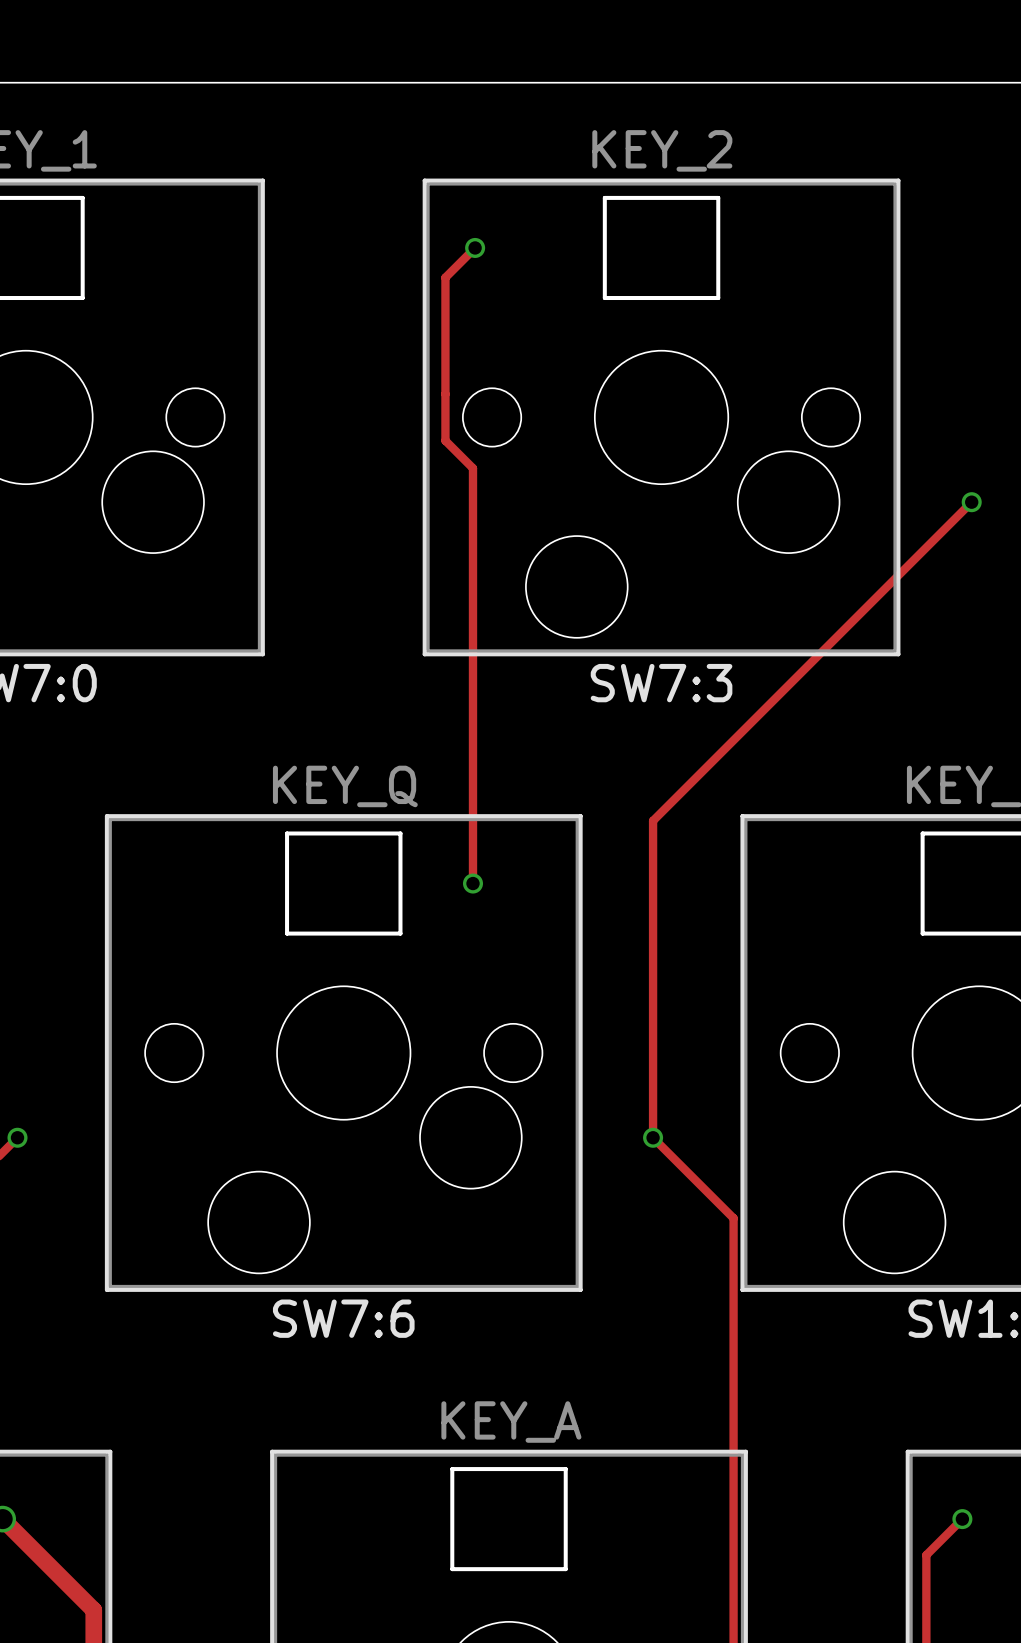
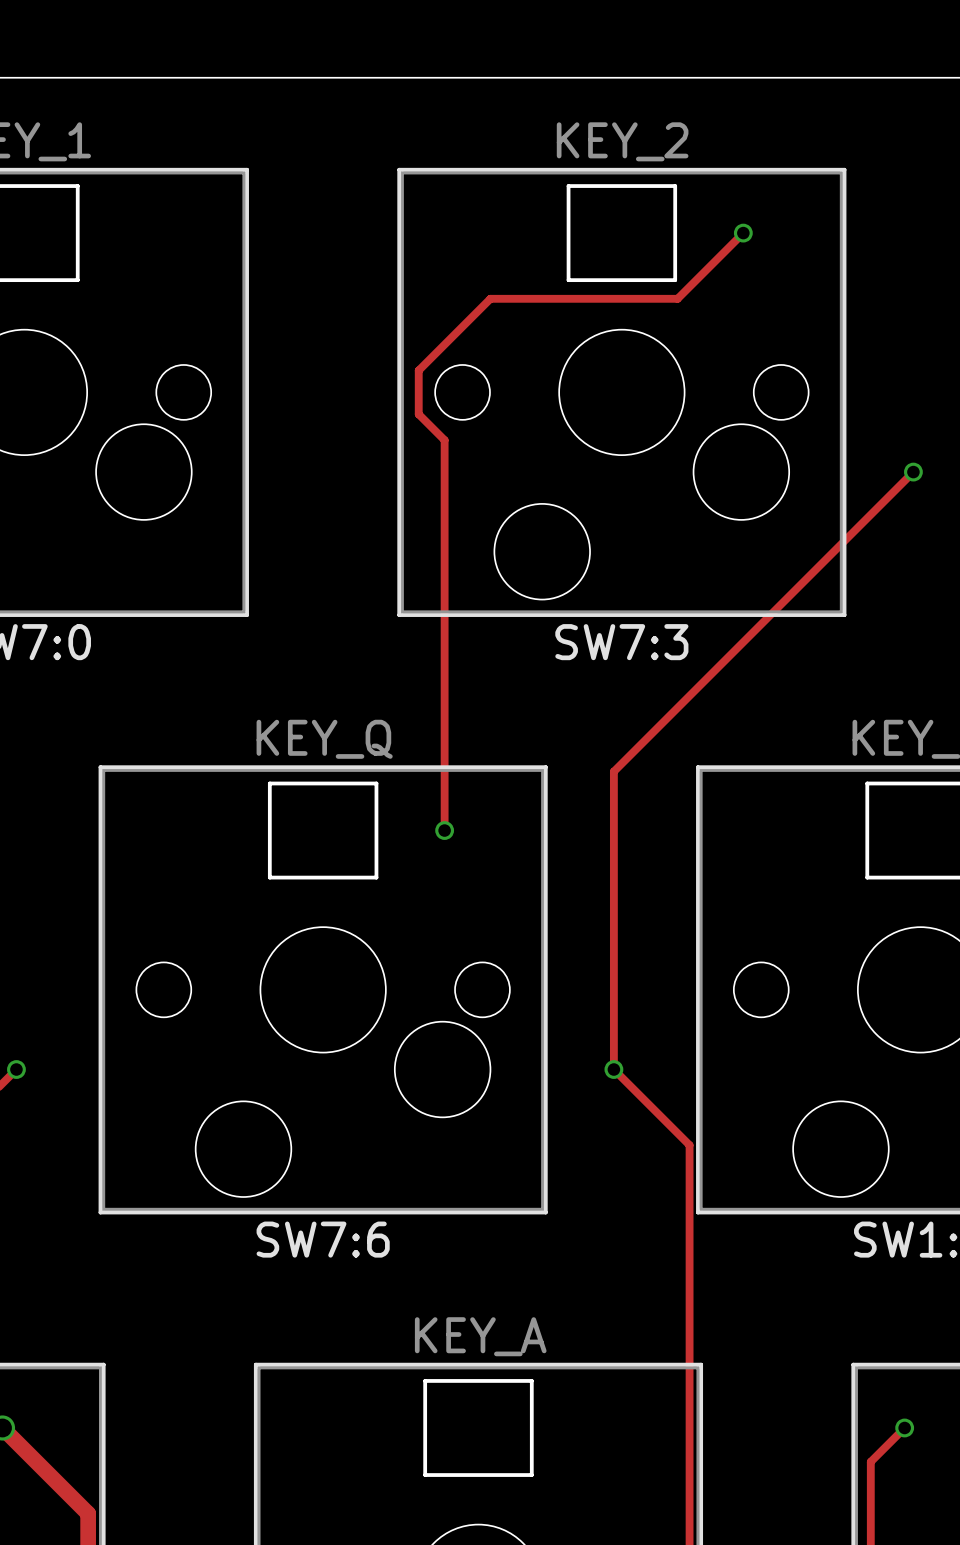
track: (475, 247) (445, 277) (445, 394) -> (743, 233) (677, 298) (490, 298) (418, 370)
via: (475, 247) -> none
via: none -> (743, 233)

